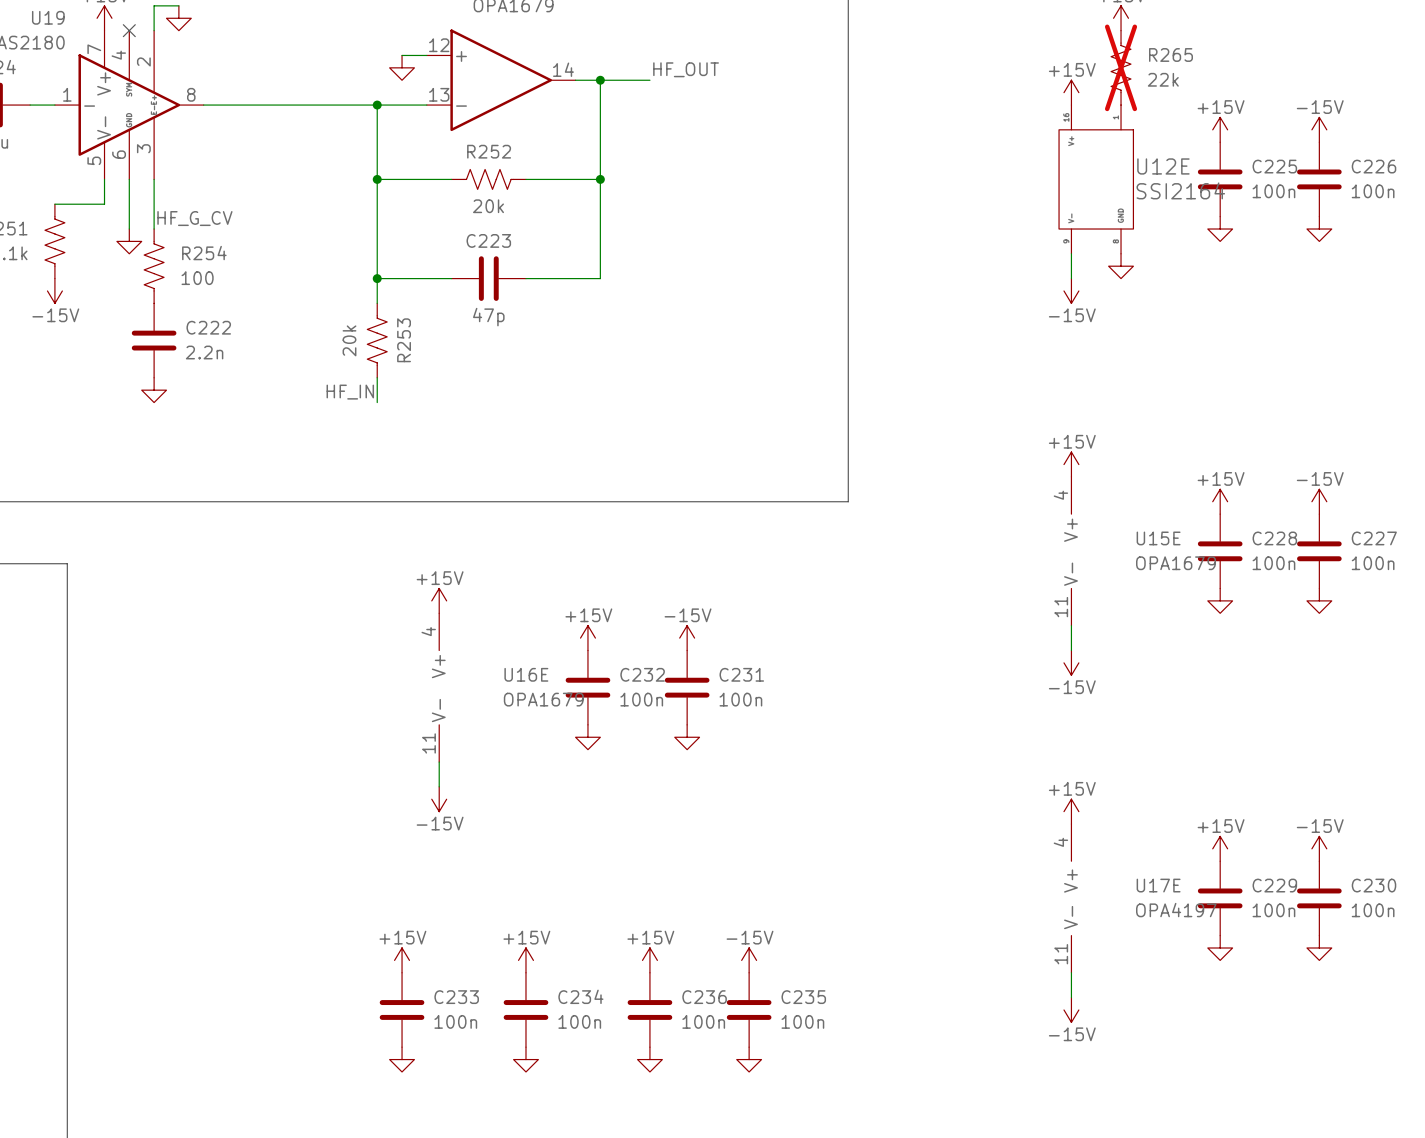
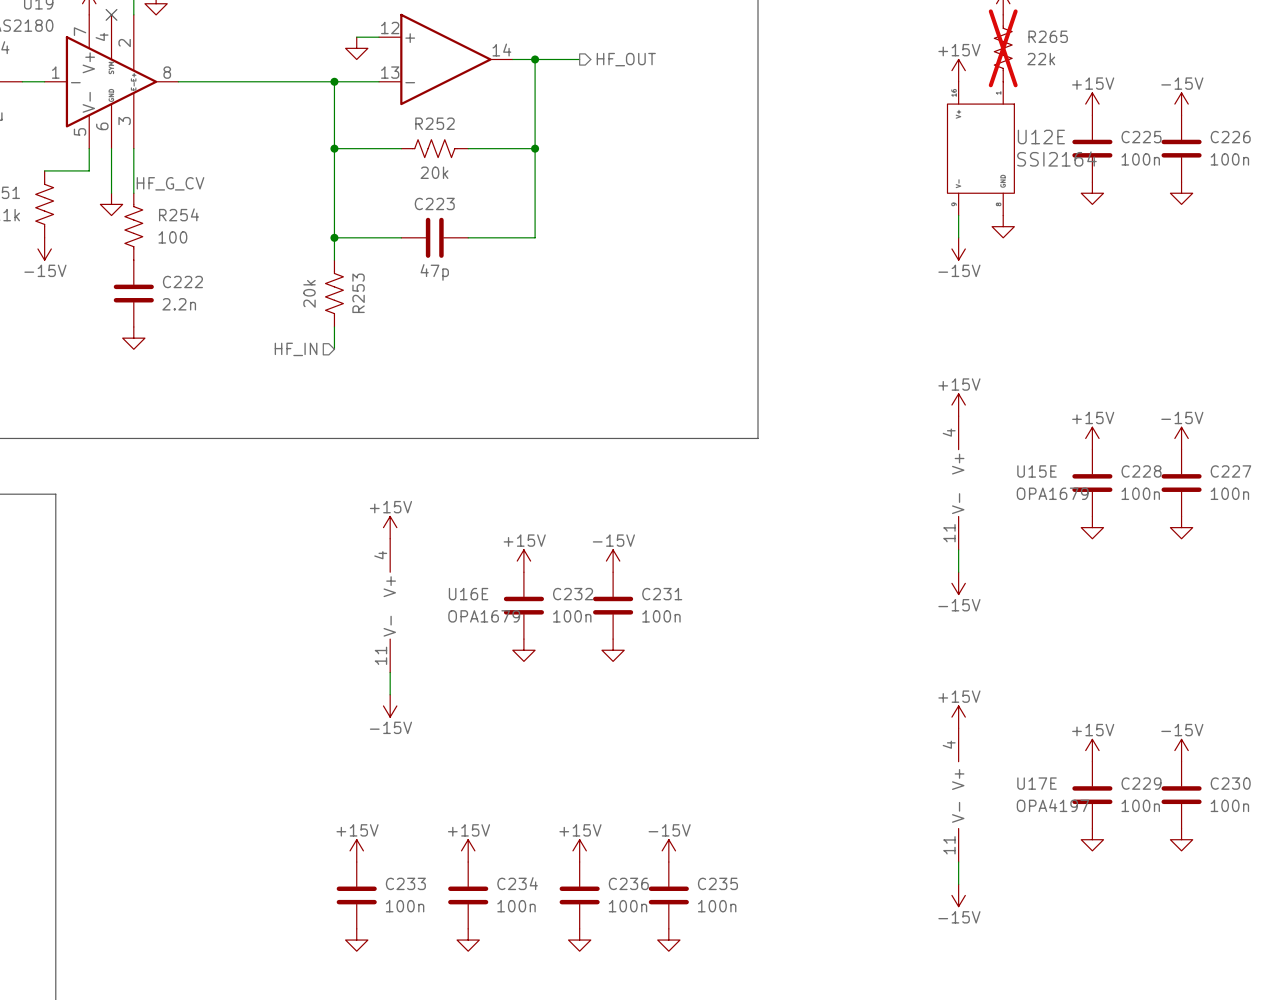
label: HF_OUT (686, 69) -> none
hierarchical label: none -> HF_OUT (626, 59)
label: HF_IN (350, 392) -> none
hierarchical label: none -> HF_IN (296, 349)

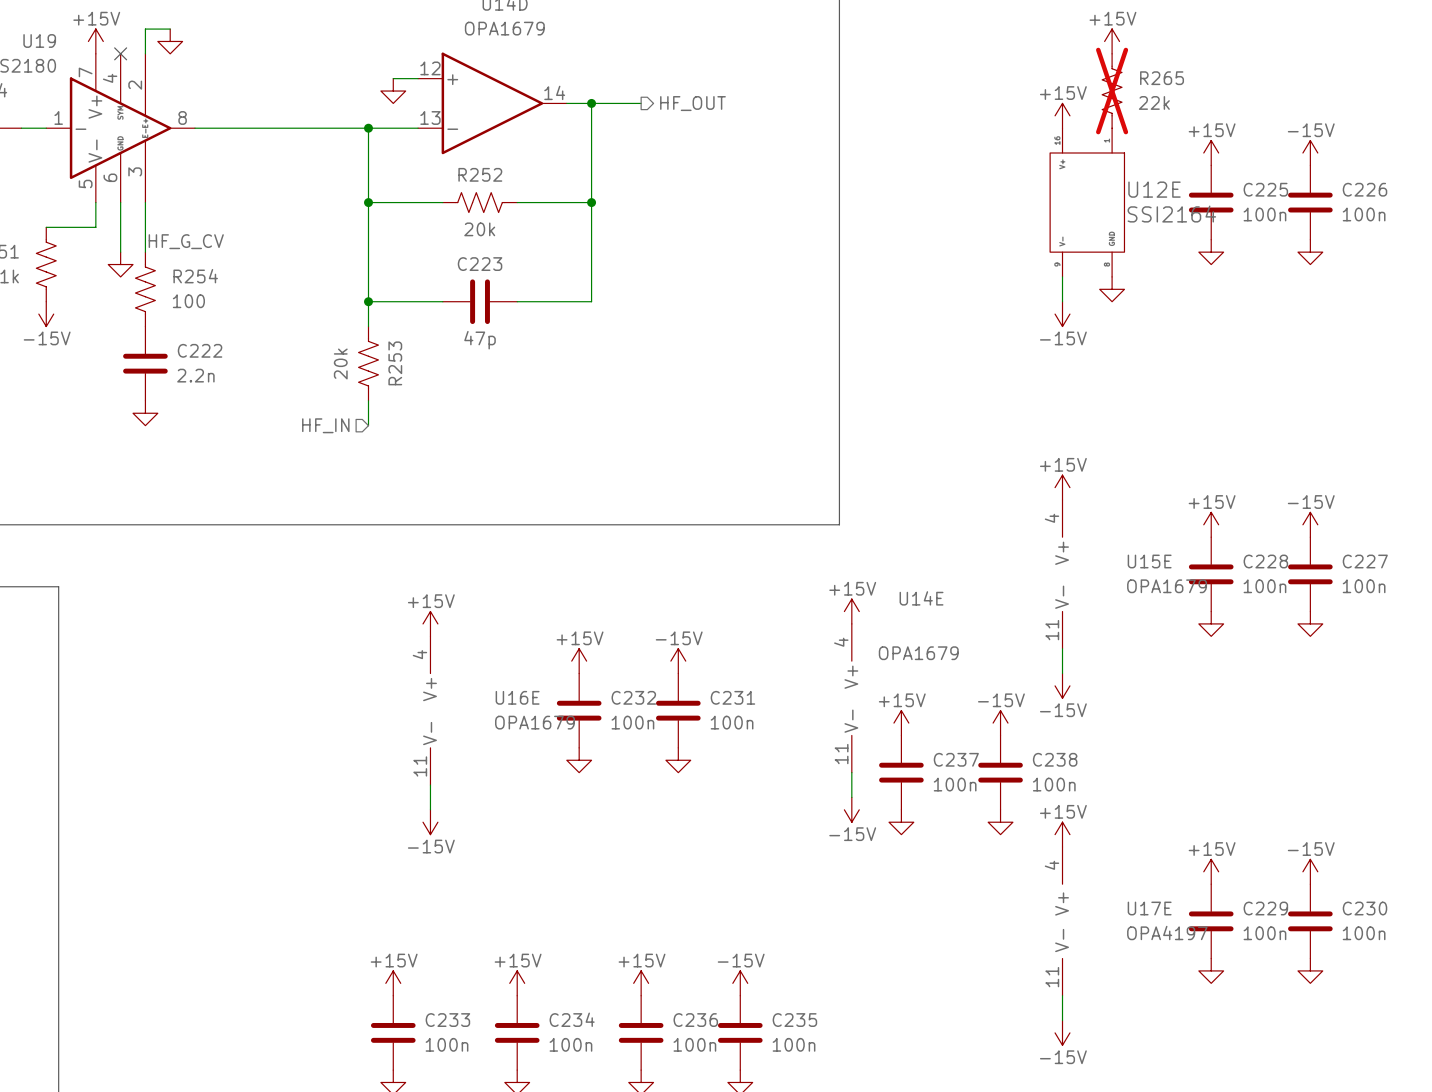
power symbol: none -> +15V (851, 611)
U14E: none -> OPA1679 (851, 698)
power symbol: none -> +15V (901, 723)
power symbol: none -> -15V (1000, 723)
wire: none -> (851, 772) (851, 797)
C237: none -> 100n (901, 772)
C238: none -> 100n (1000, 772)
power symbol: none -> -15V (851, 809)
power symbol: none -> (901, 822)
power symbol: none -> (1000, 822)

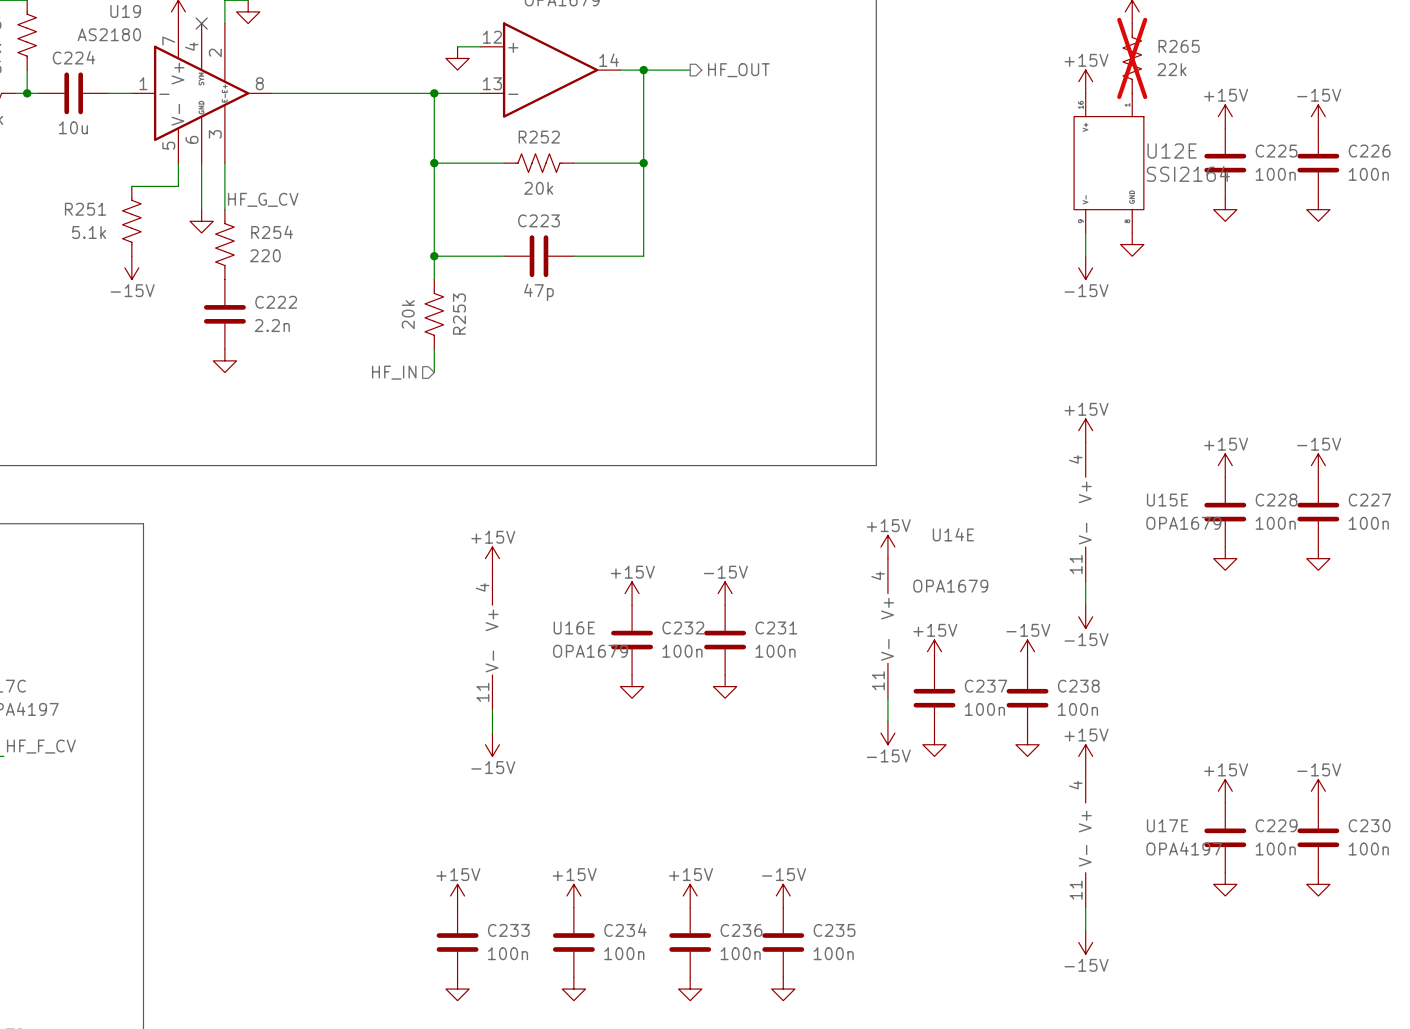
R254 value: 100 (188, 301) -> 220 (265, 255)

